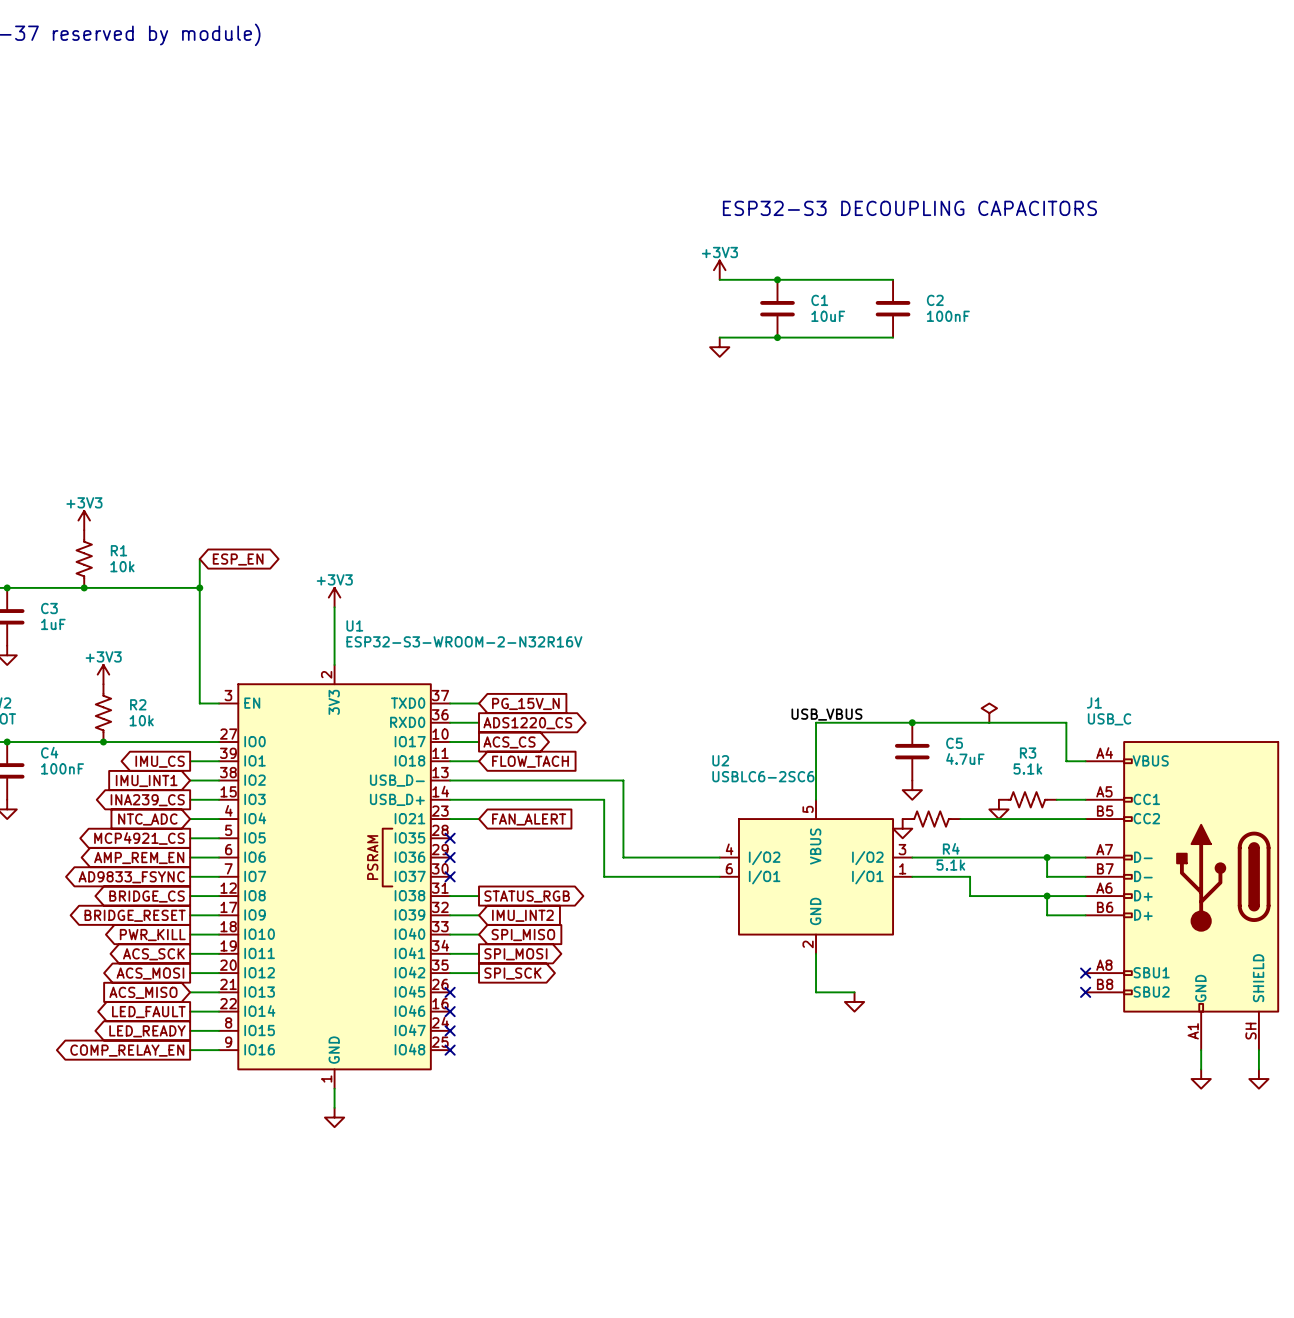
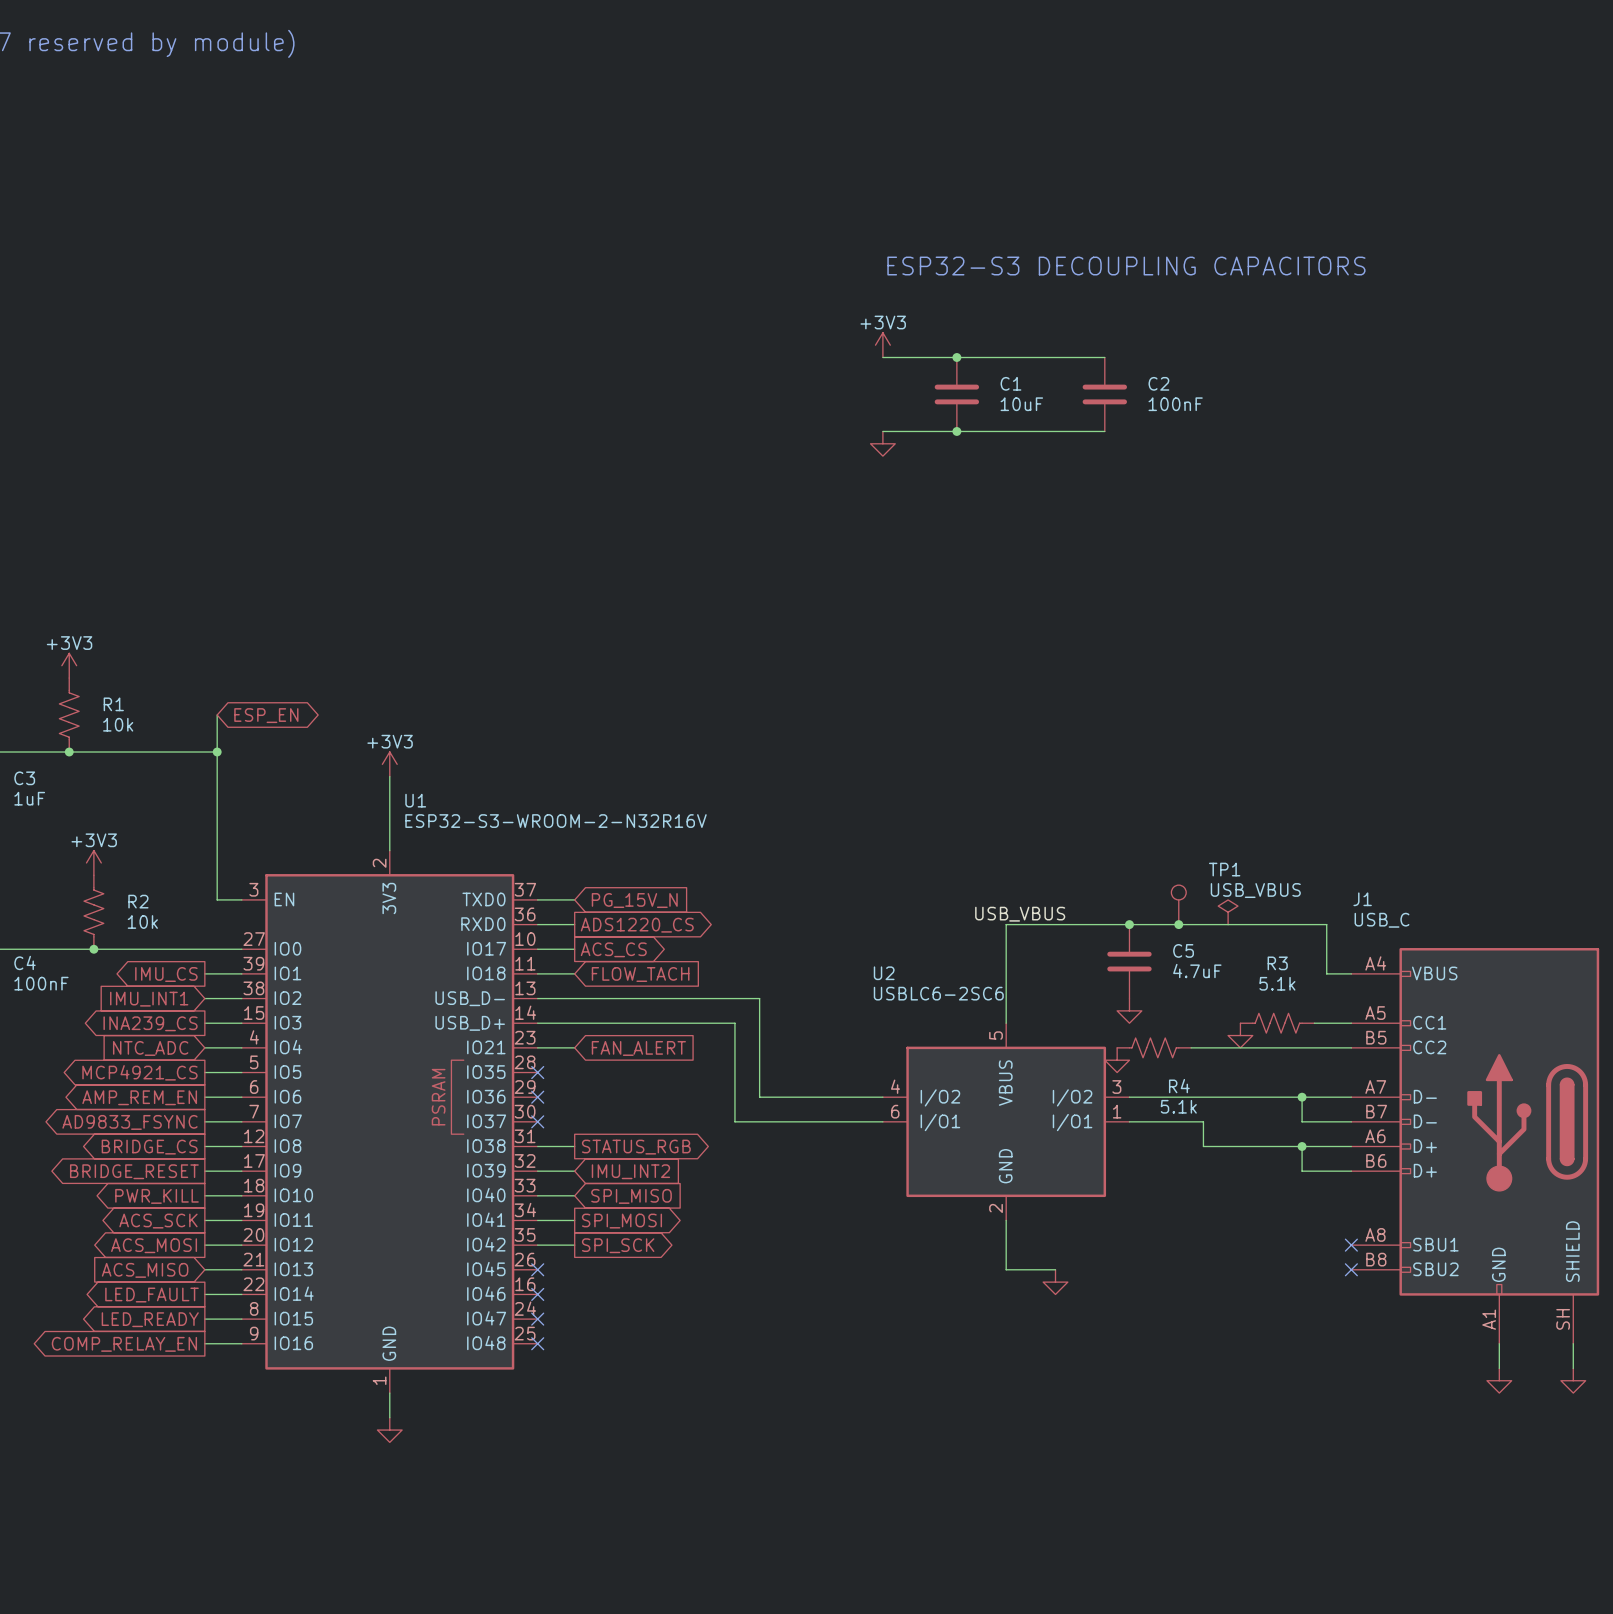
TP1: none -> USB_VBUS (1178, 904)
junction: none -> (1178, 924)

